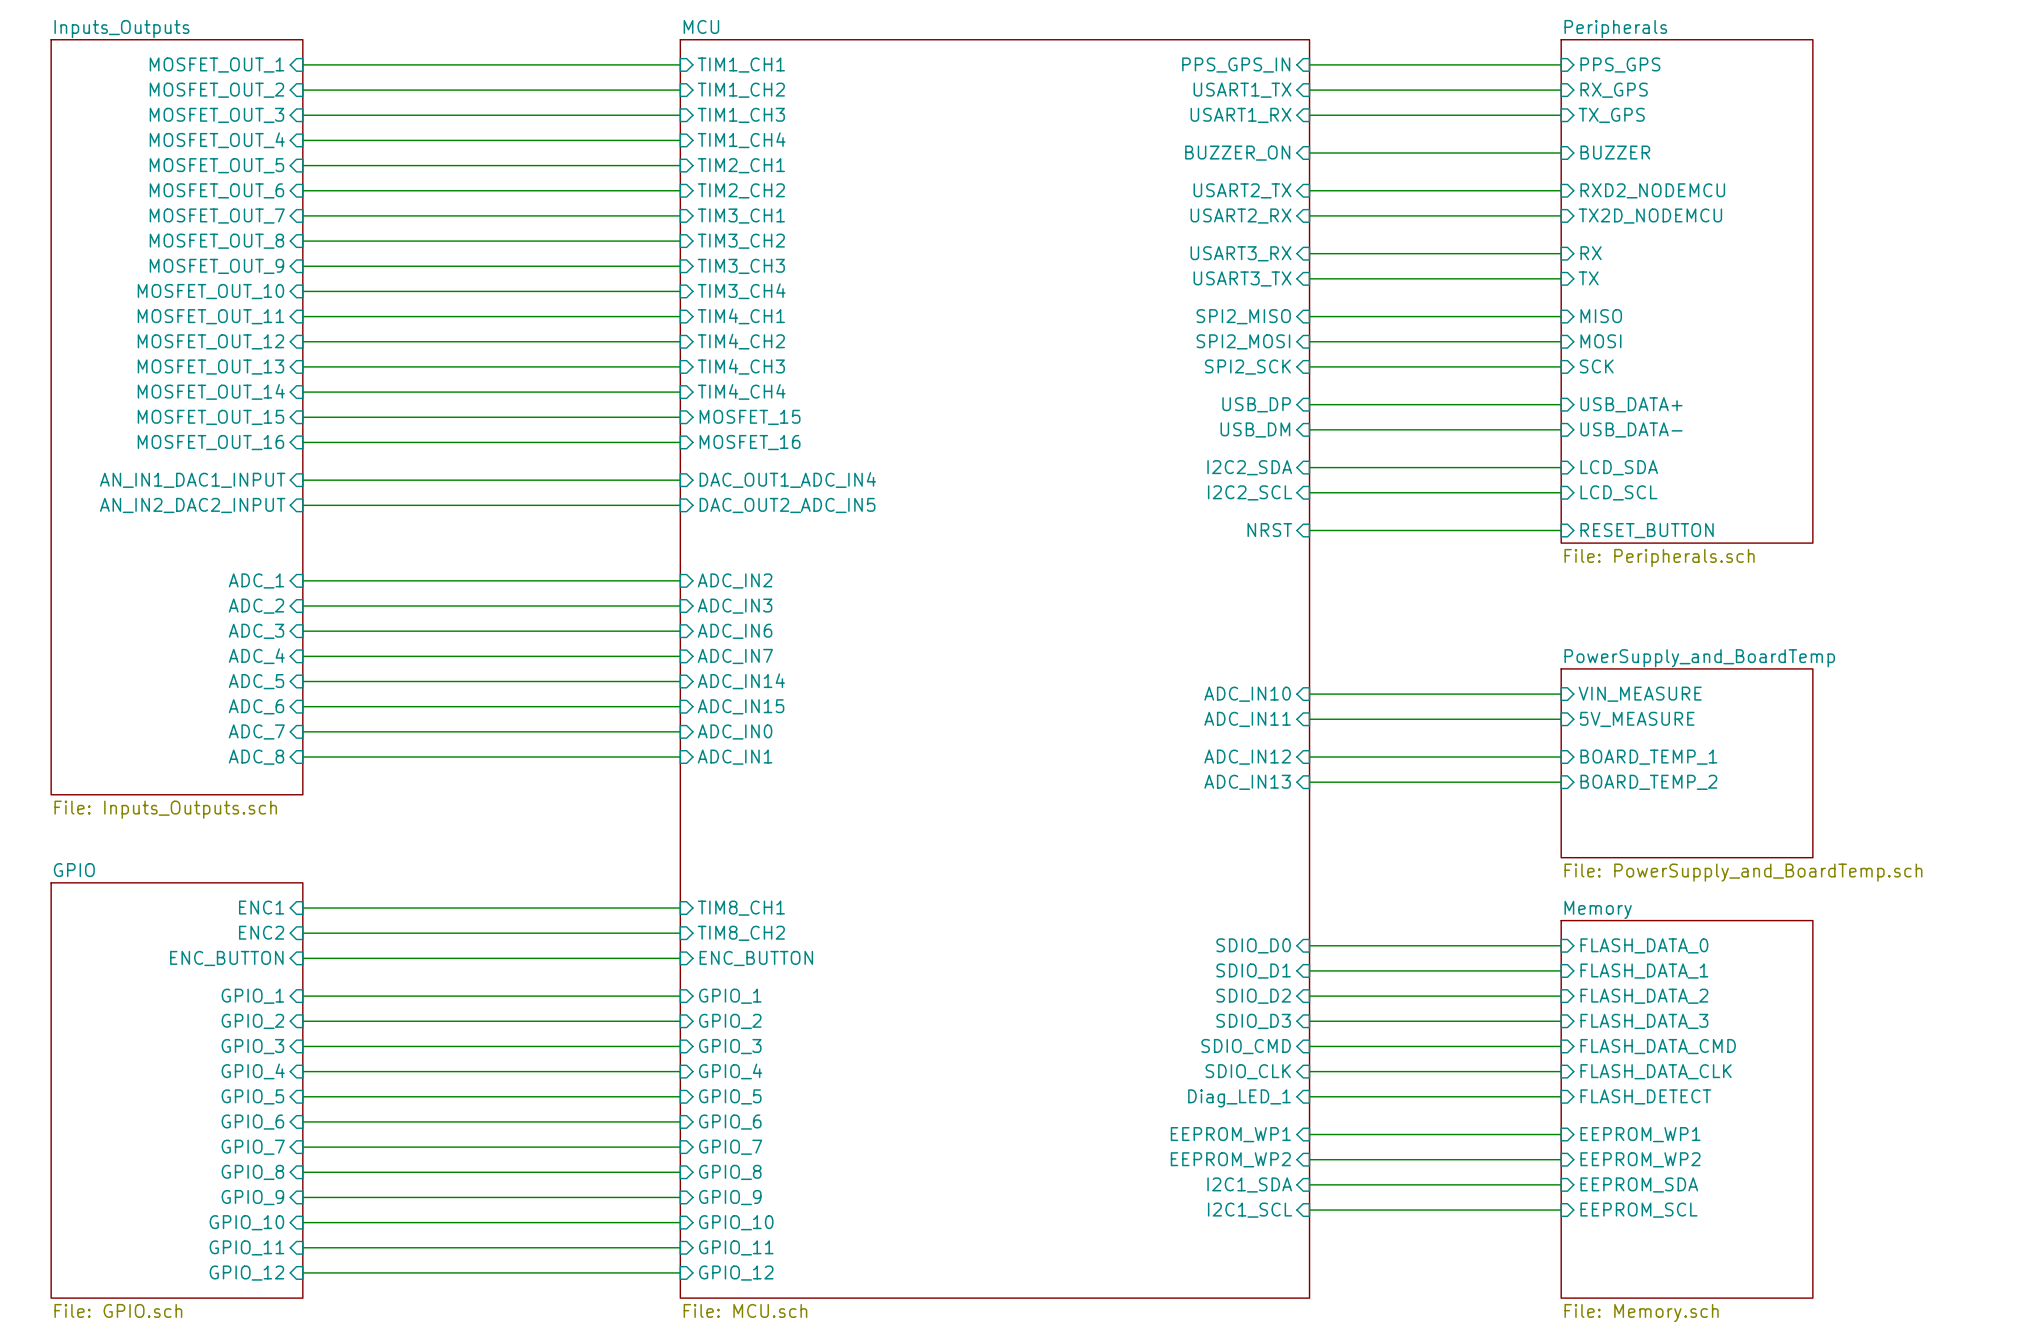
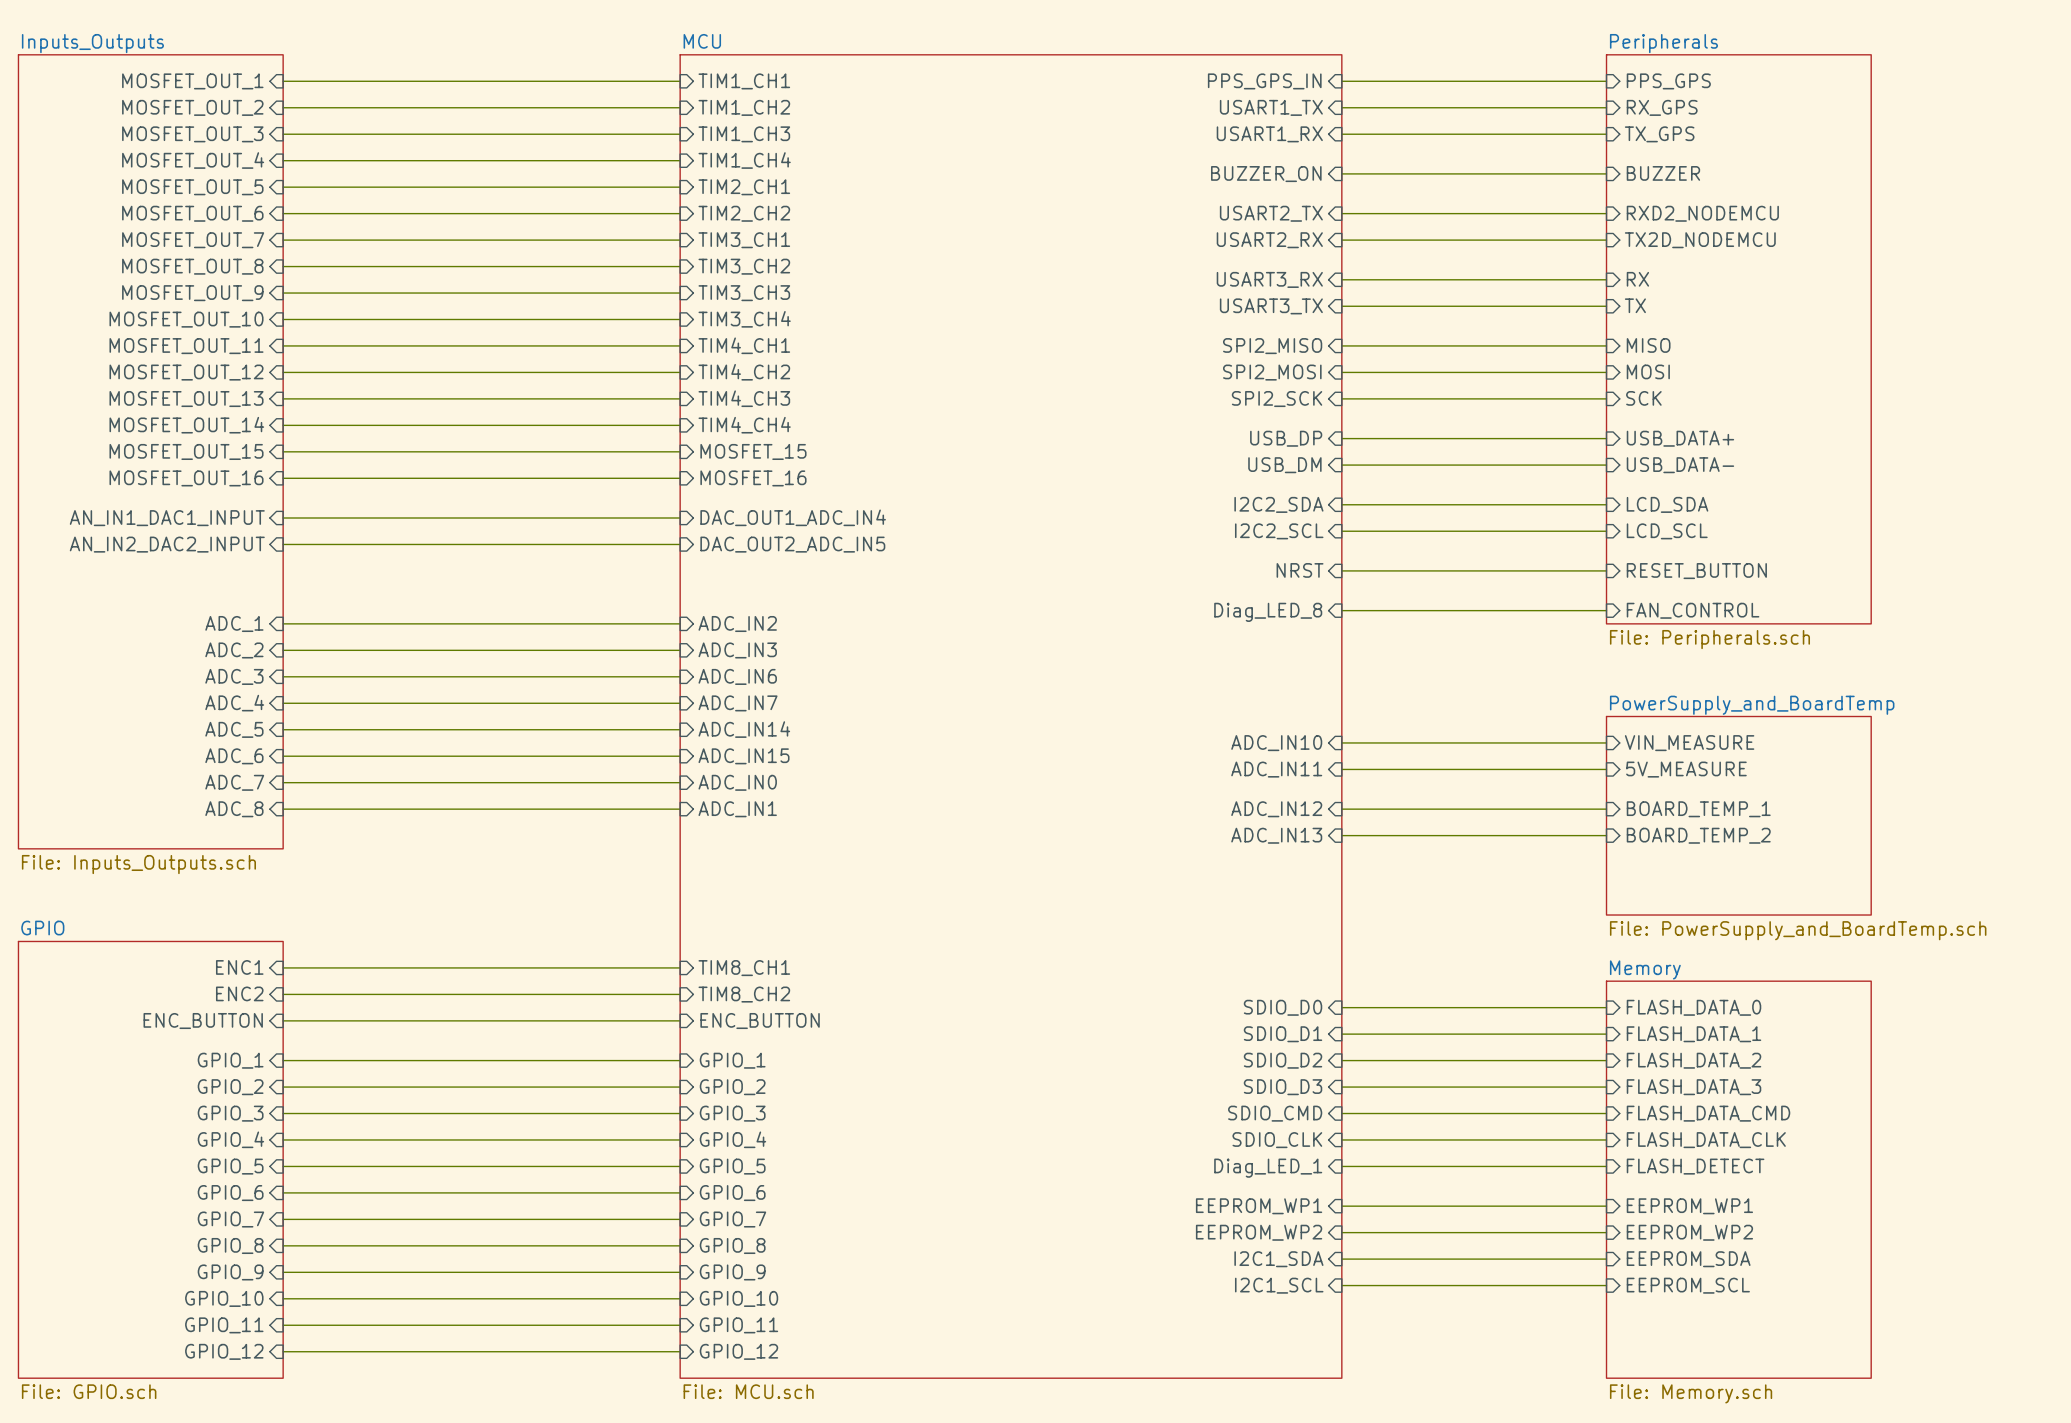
sheet Peripherals: File: Peripherals.sch (1687, 291) -> none
sheet Peripherals: none -> File: Peripherals.sch (1738, 339)
wire: none -> (1341, 610) (1606, 610)
sheet pin: none -> FAN_CONTROL (1693, 610)
sheet pin: none -> Diag_LED_8 (1268, 612)

